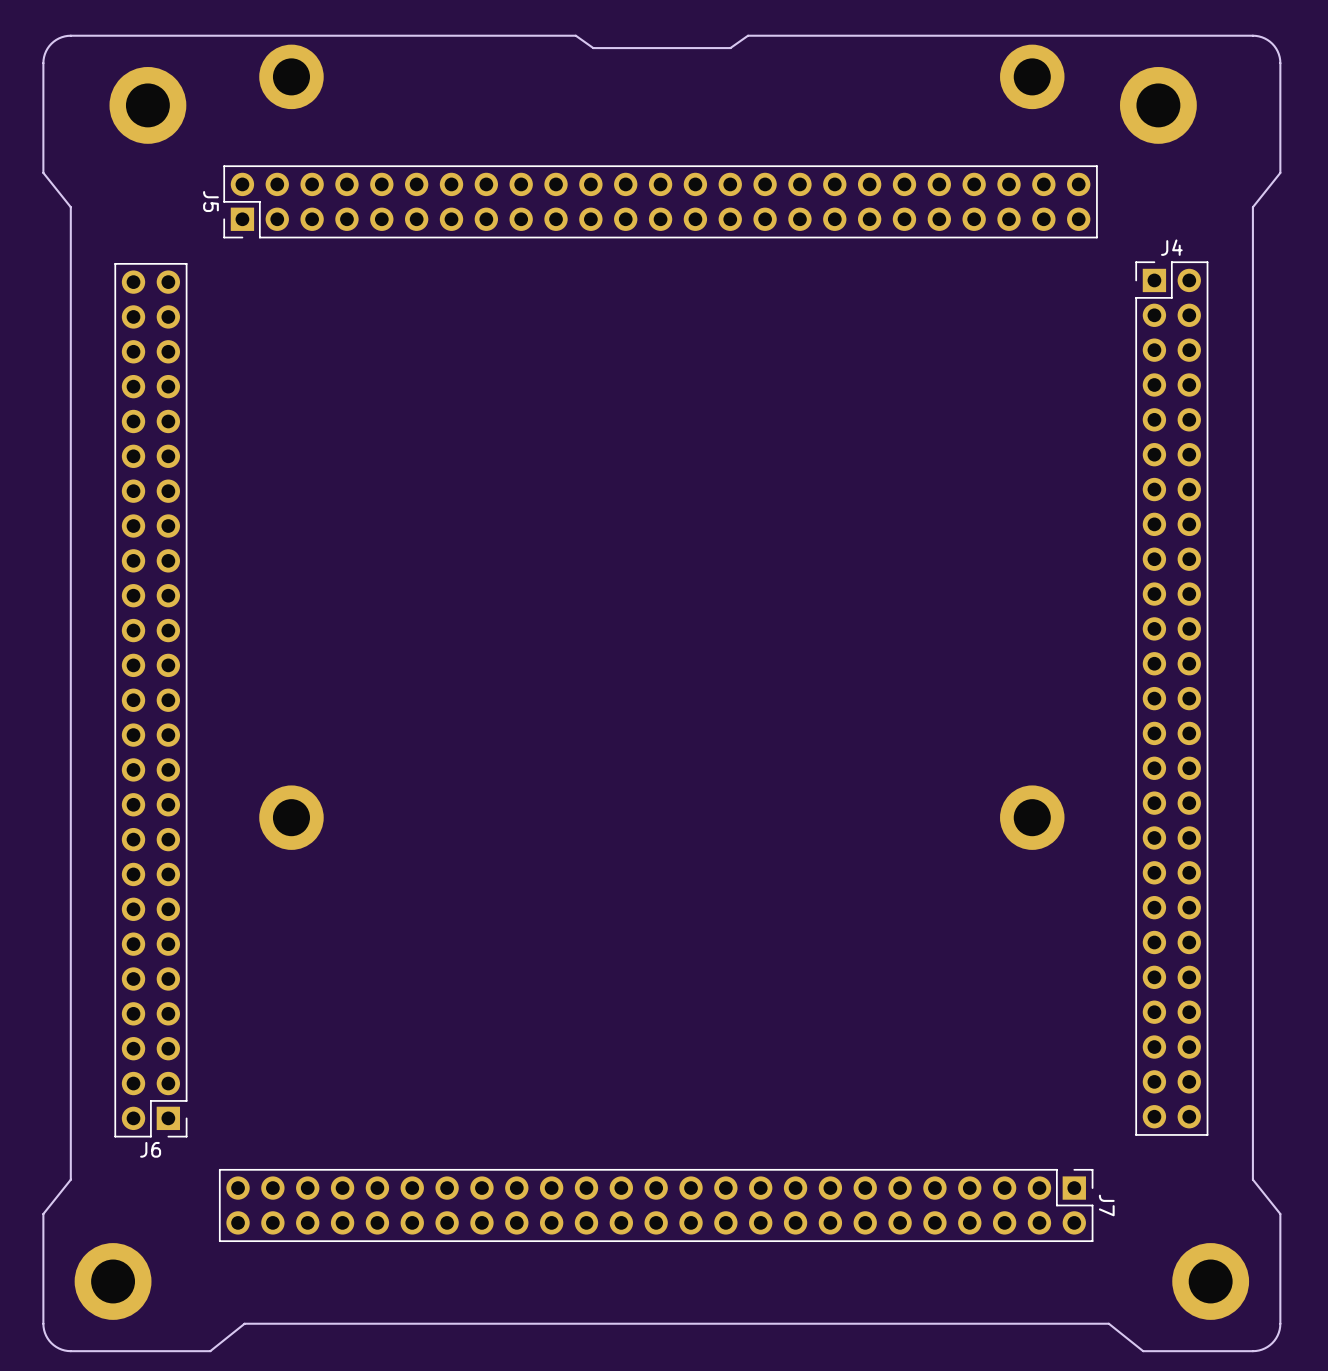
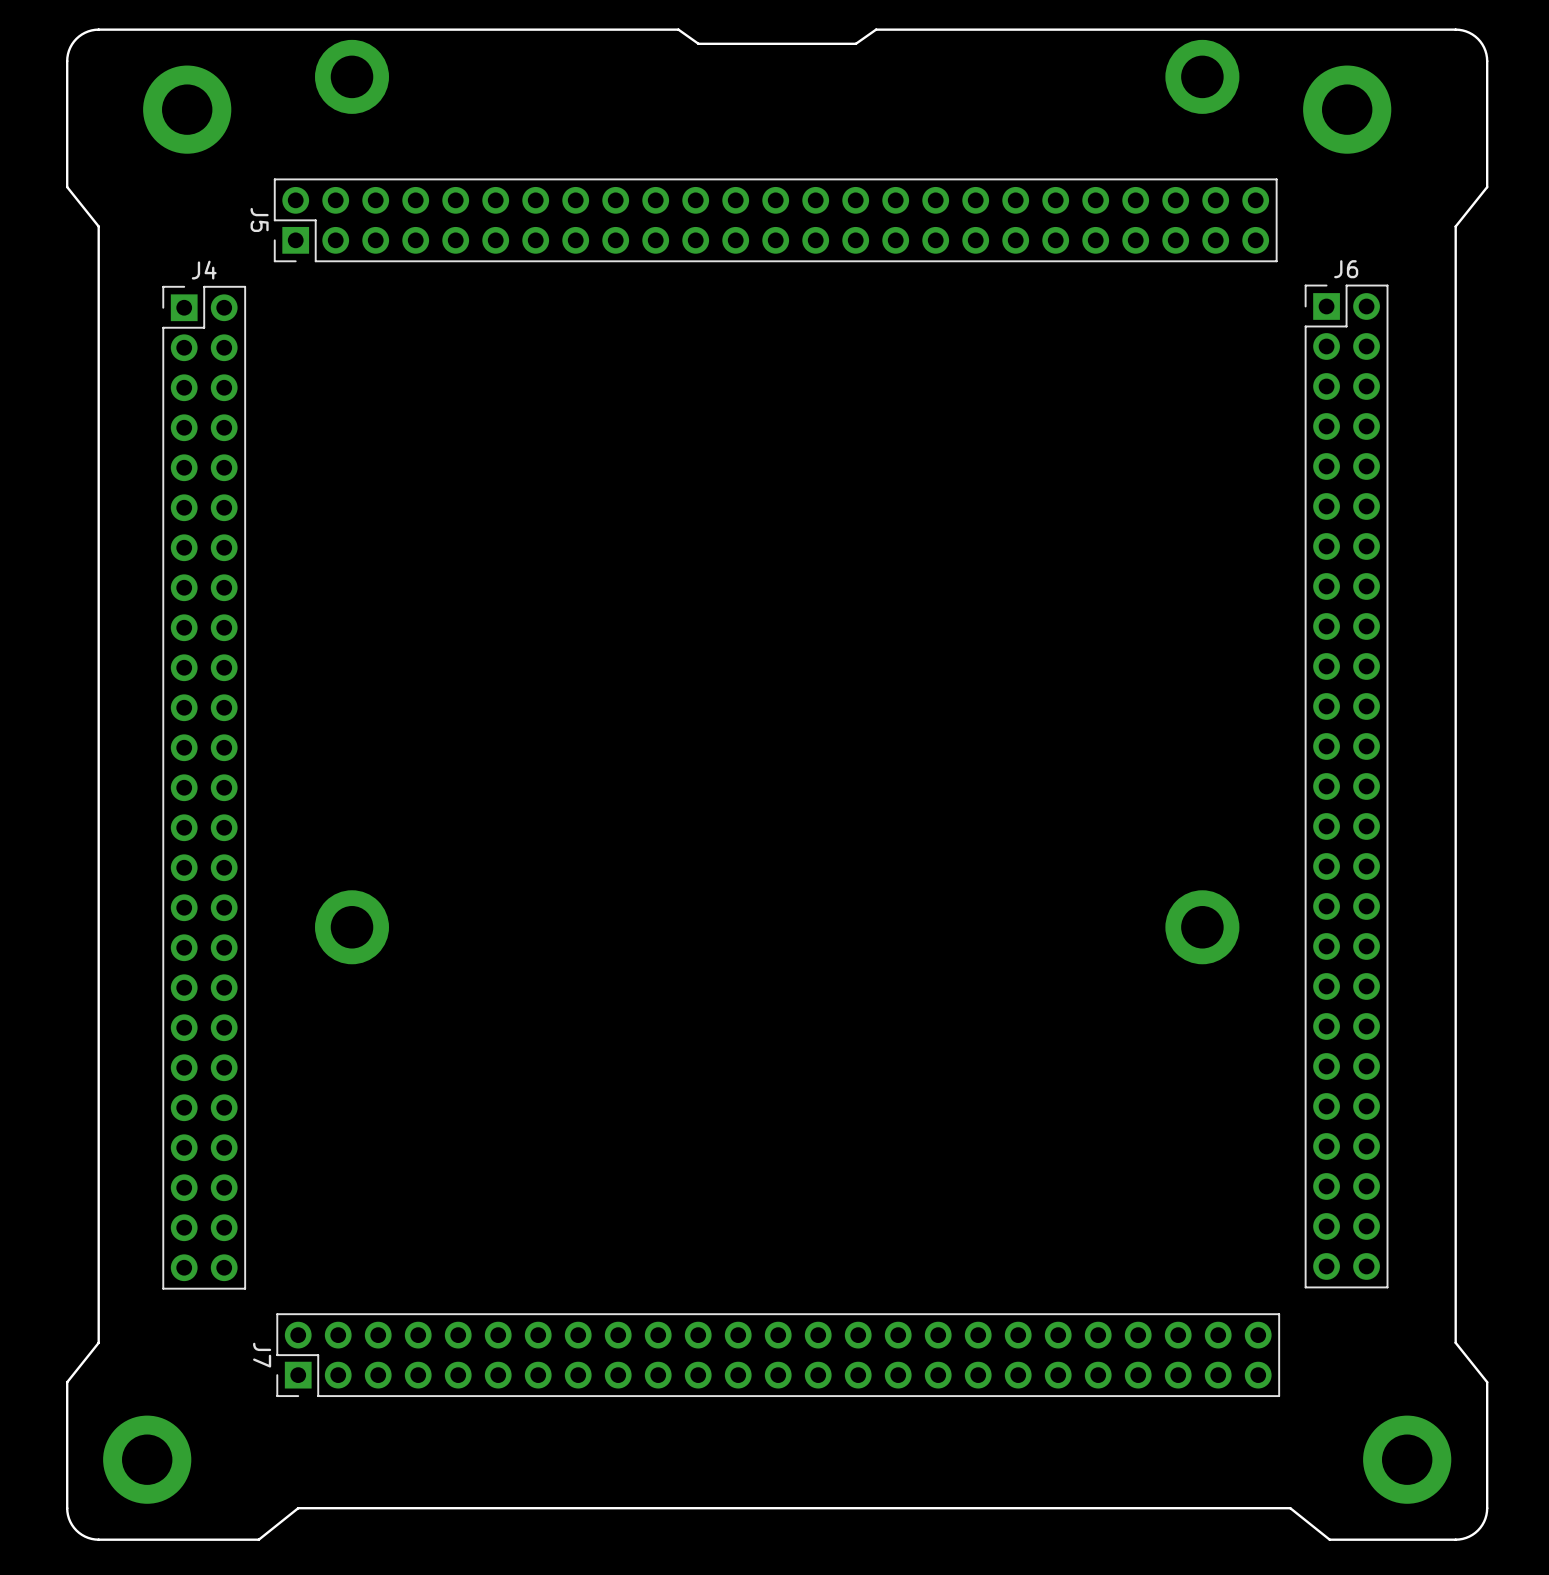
J4 position: (1171, 698) -> (204, 787)
J6 rotation: 0° (150, 700) -> 180° (1346, 786)
J6 position: (150, 700) -> (1346, 786)
J7 rotation: 0° (656, 1205) -> 180° (778, 1355)

